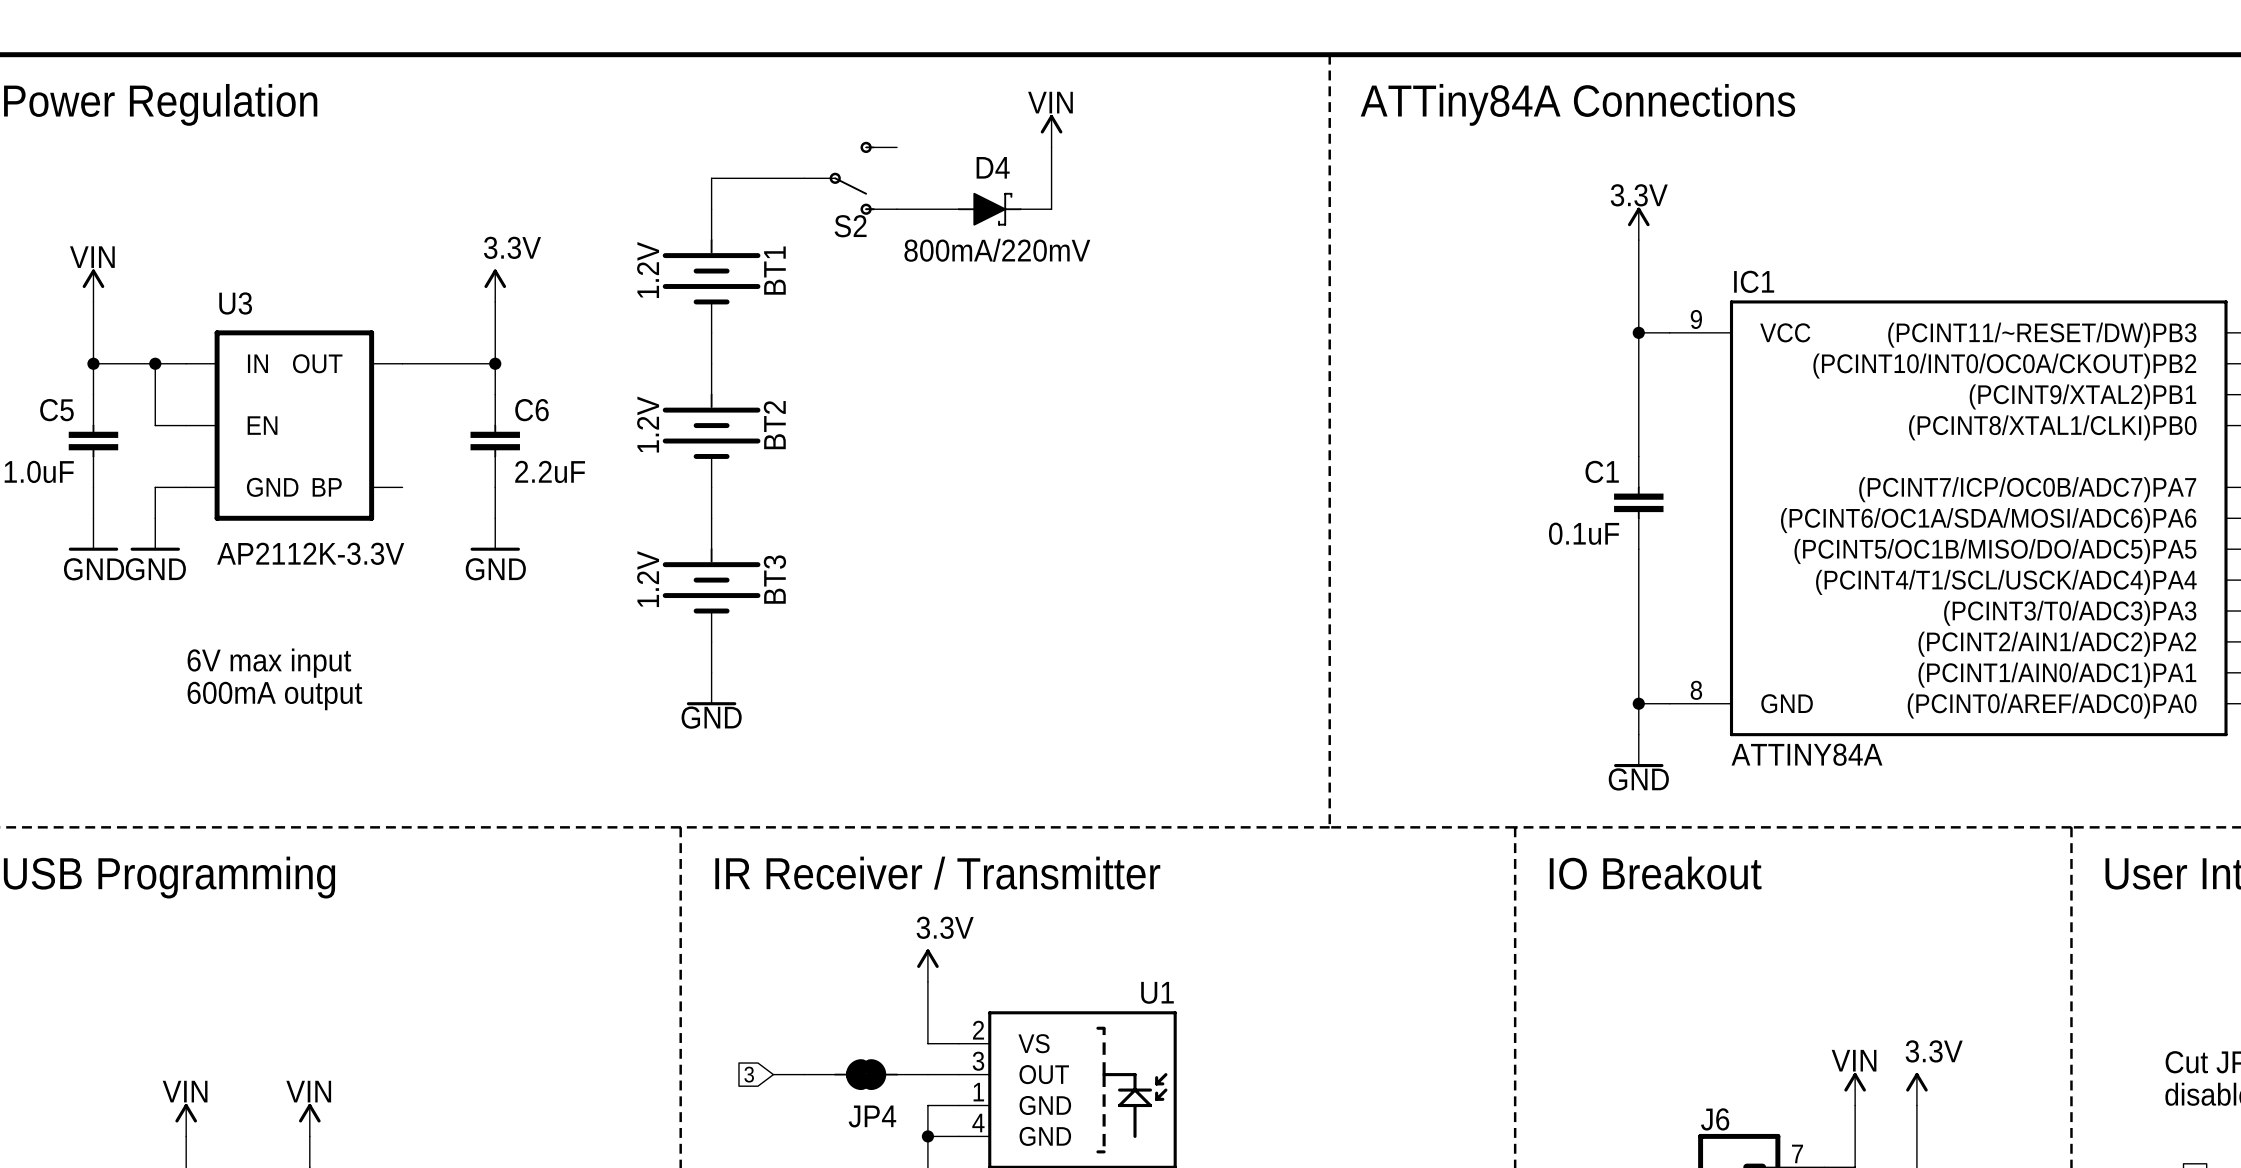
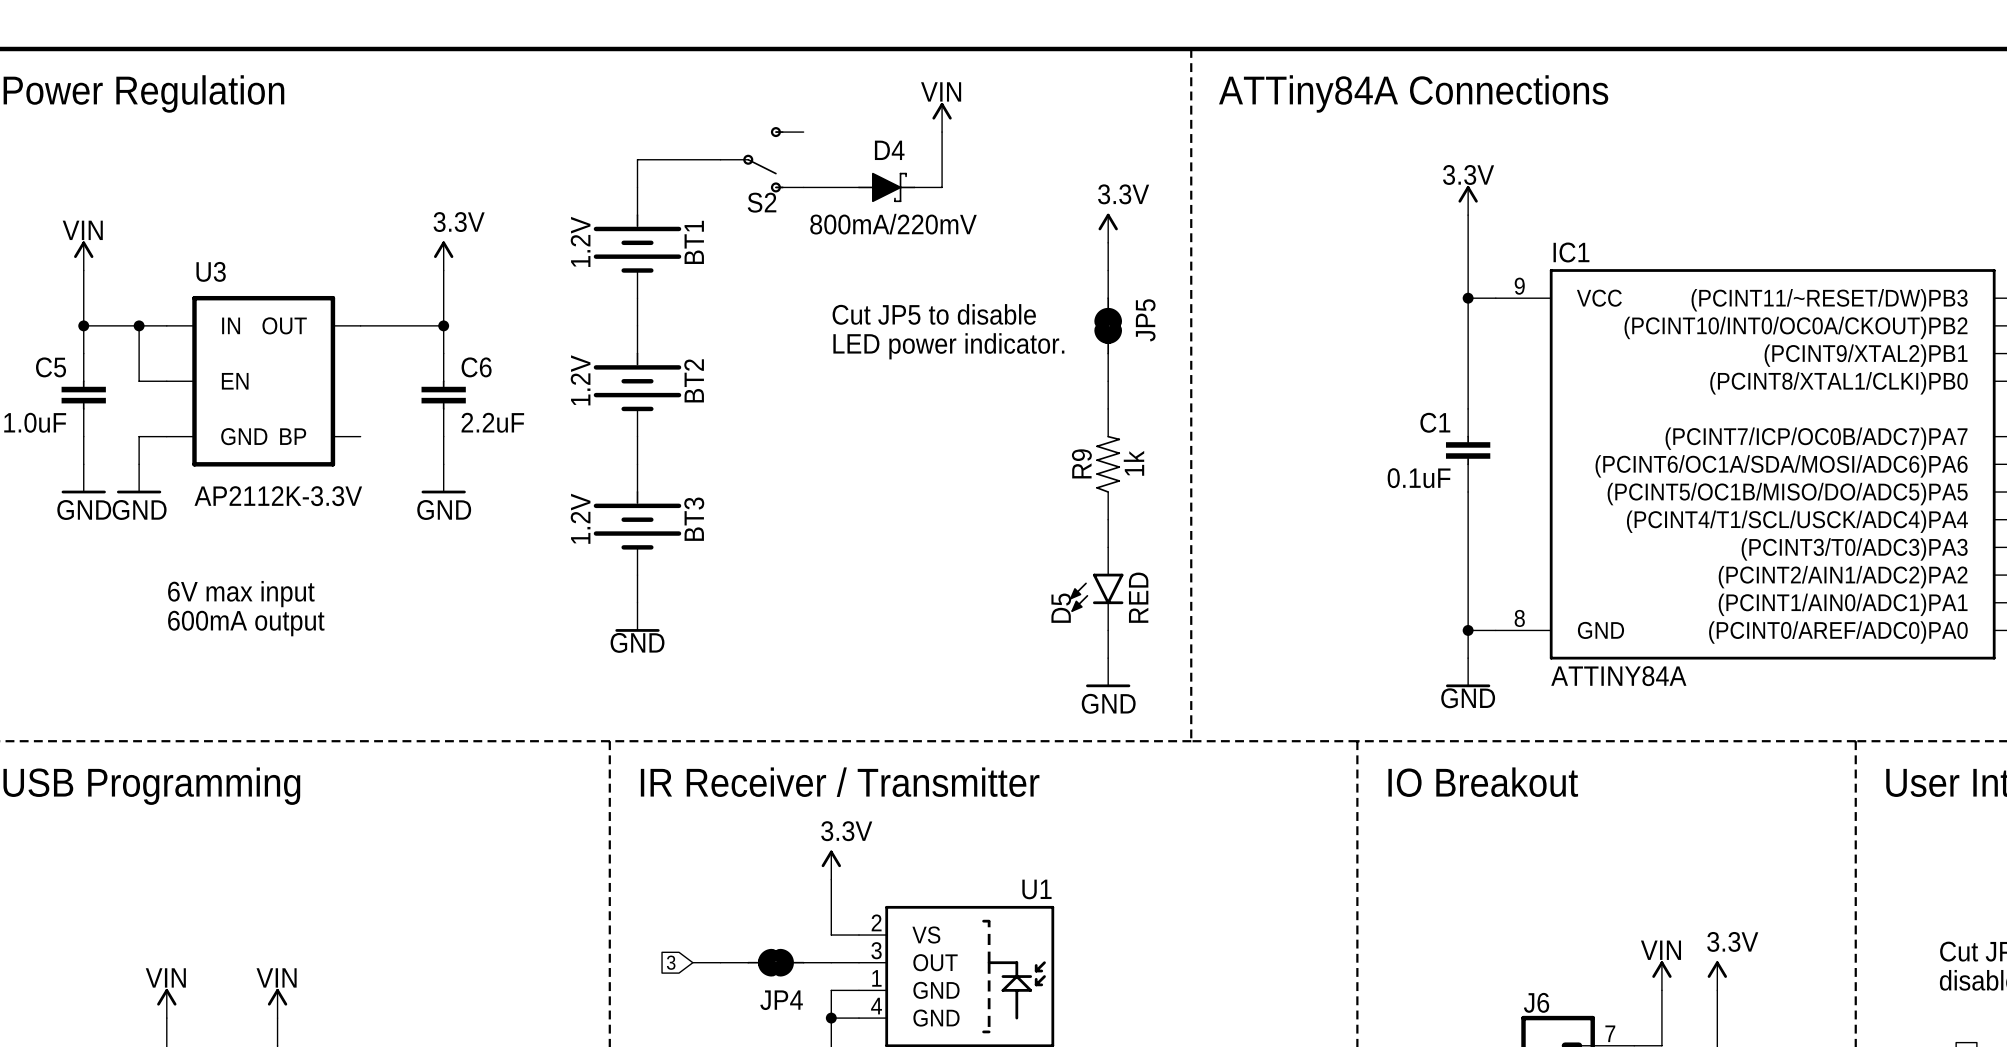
power symbol: none -> 3.3V (1108, 228)
wire: none -> (1108, 242) (1108, 270)
text: none -> Cut JP5 to disable (934, 314)
JP5: none -> (1108, 325)
text: none -> LED power indicator. (948, 346)
wire: none -> (1108, 381) (1108, 408)
R9: none -> 1k (1108, 464)
wire: none -> (1108, 519) (1108, 547)
D5: none -> RED (1096, 588)
wire: none -> (1108, 630) (1108, 658)
power symbol: none -> GND (1108, 672)

